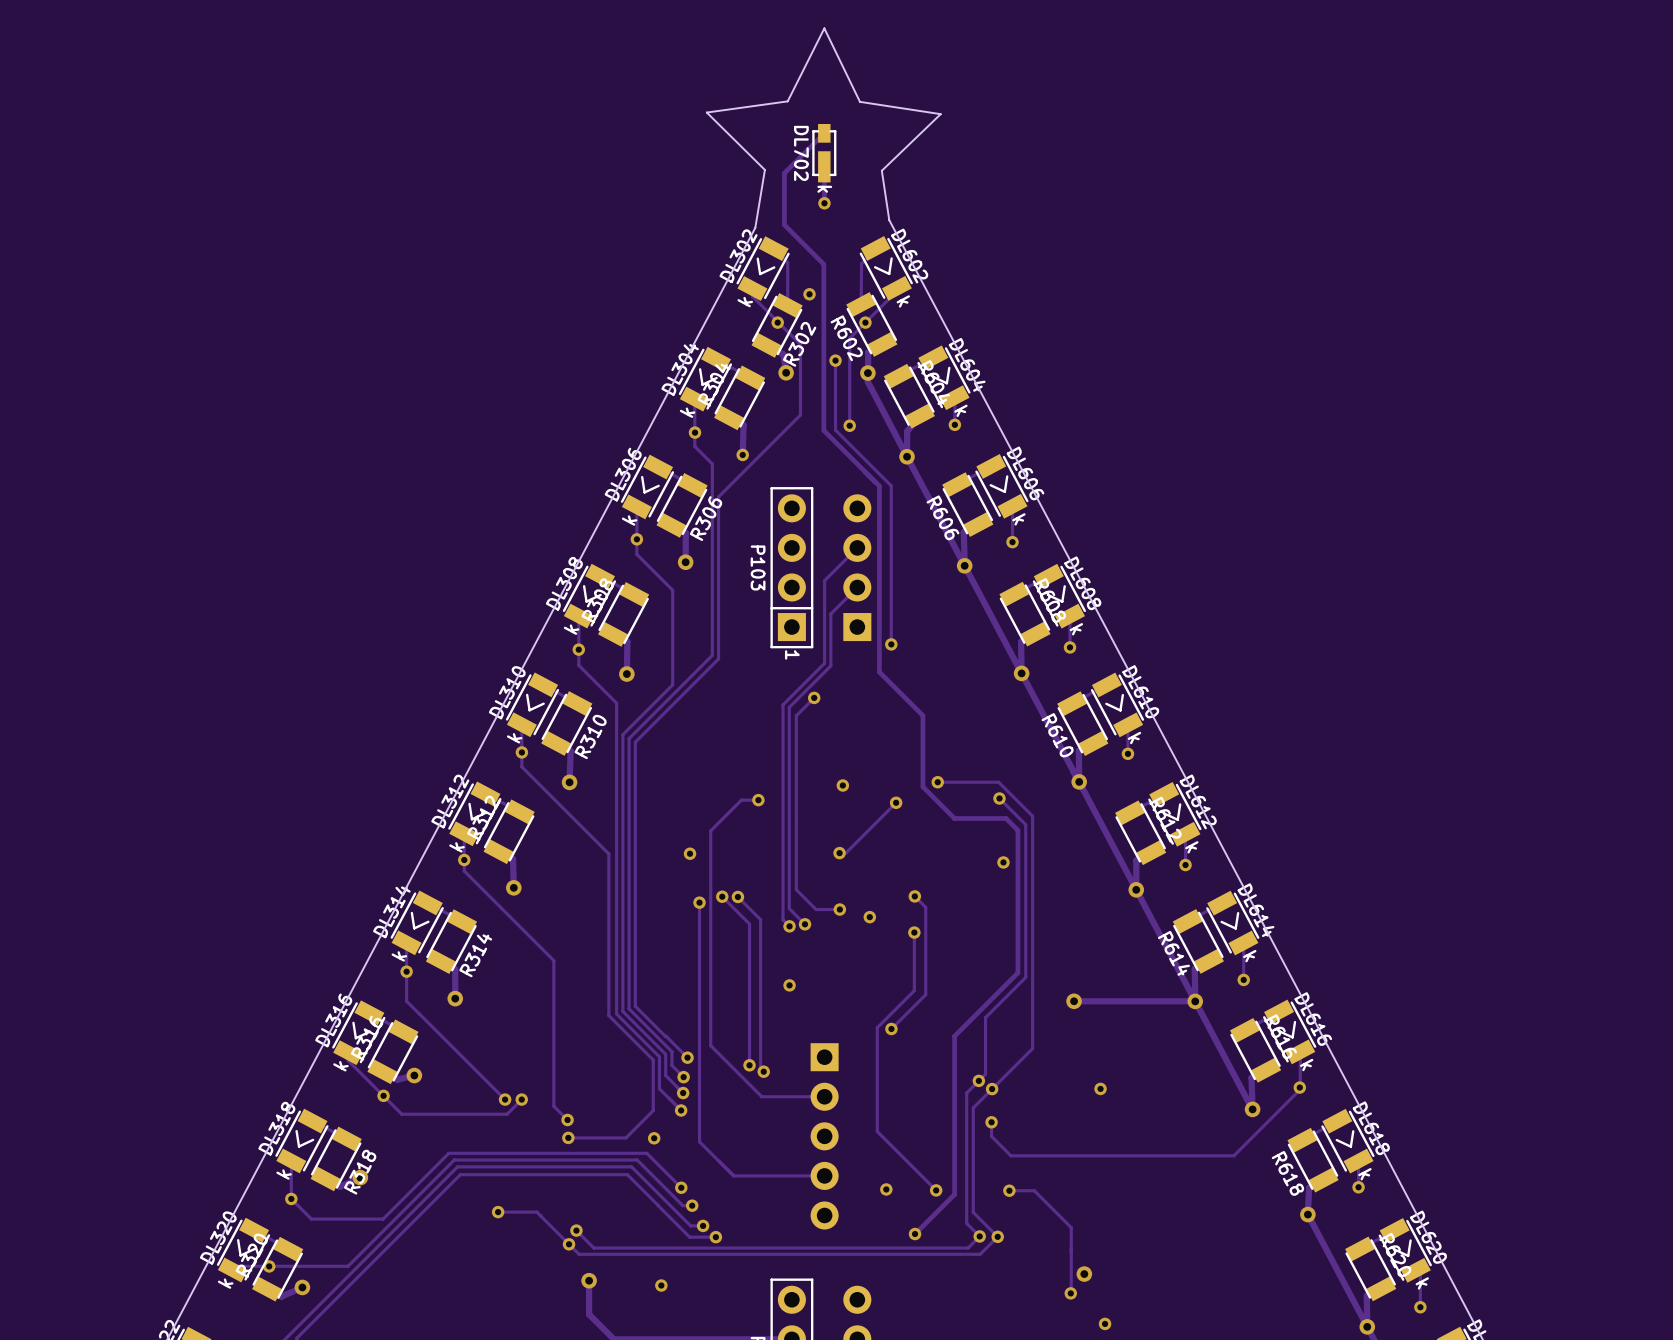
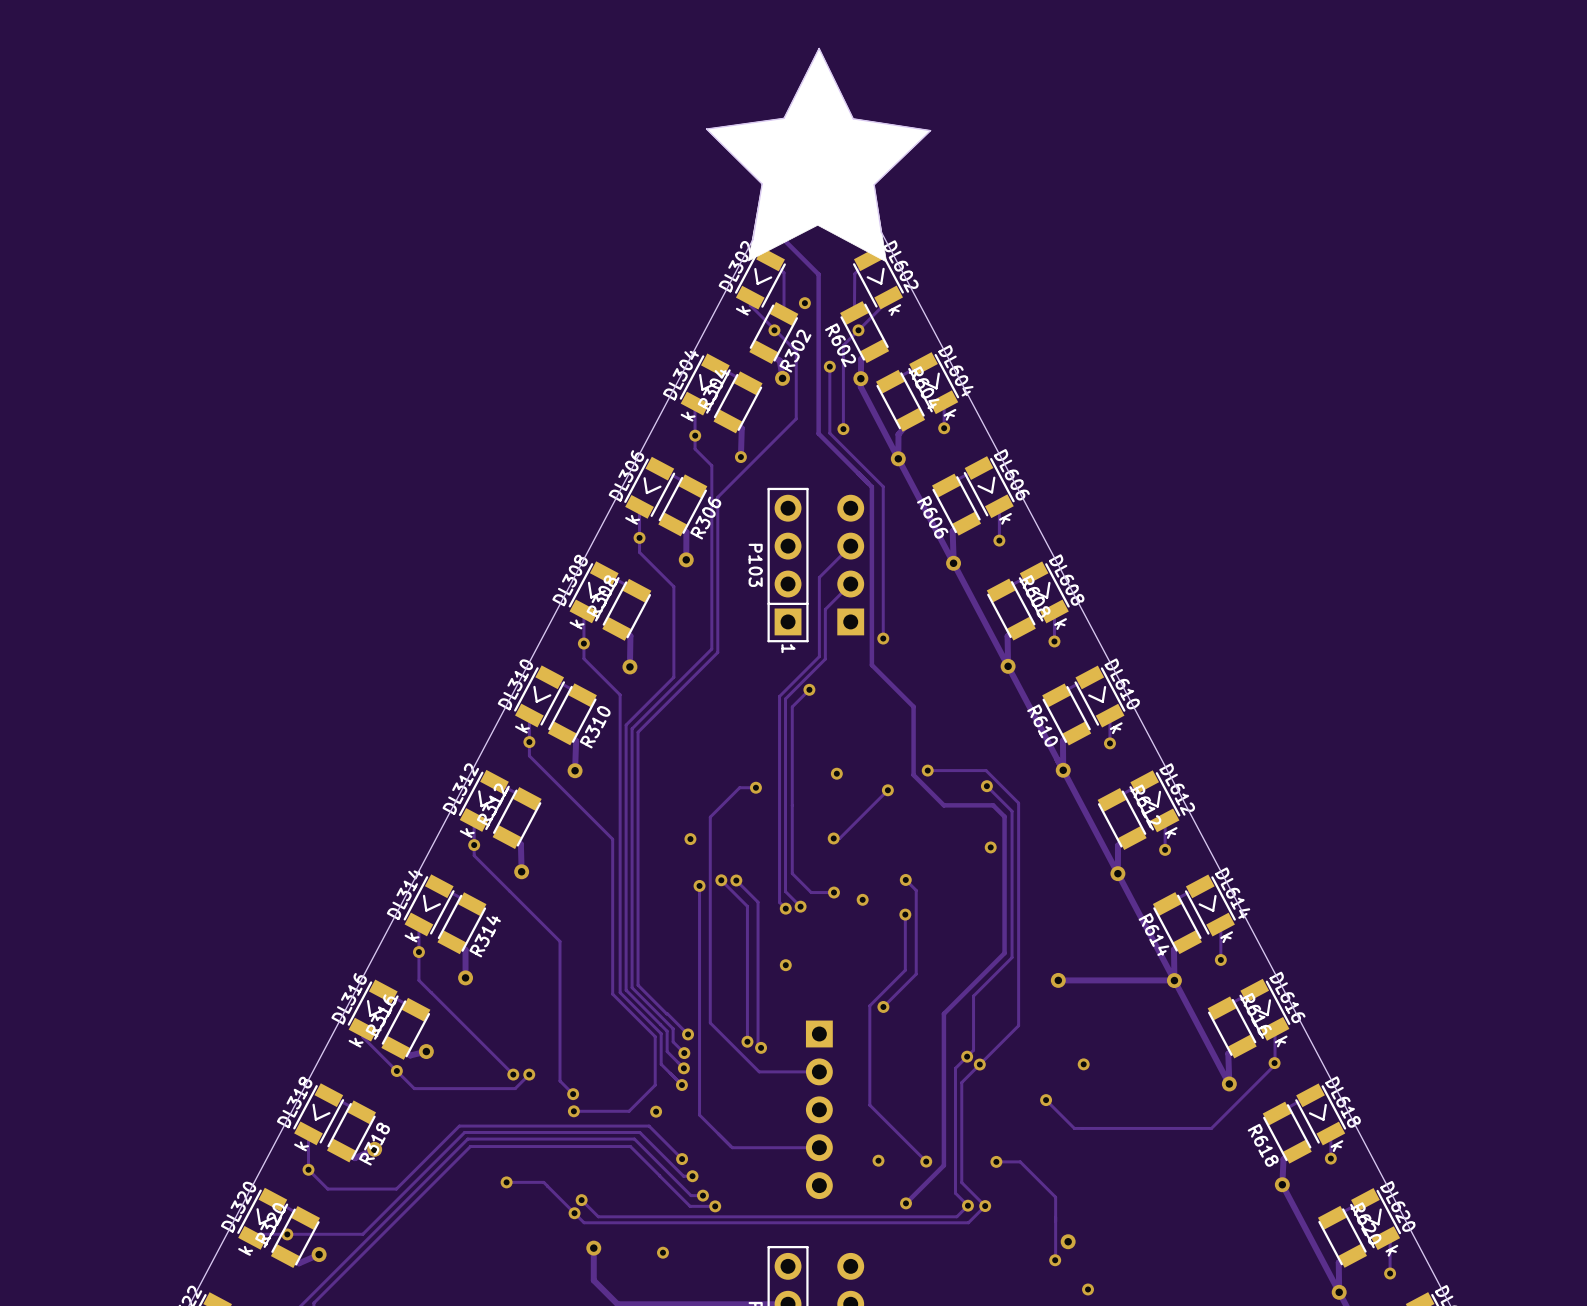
drawing: none -> [706, 48, 931, 263]
track: (991, 1122) (991, 1136) (1010, 1155) (1090, 1155) -> (1046, 1100) (1074, 1128)
via position: (991, 1122) -> (1046, 1100)

